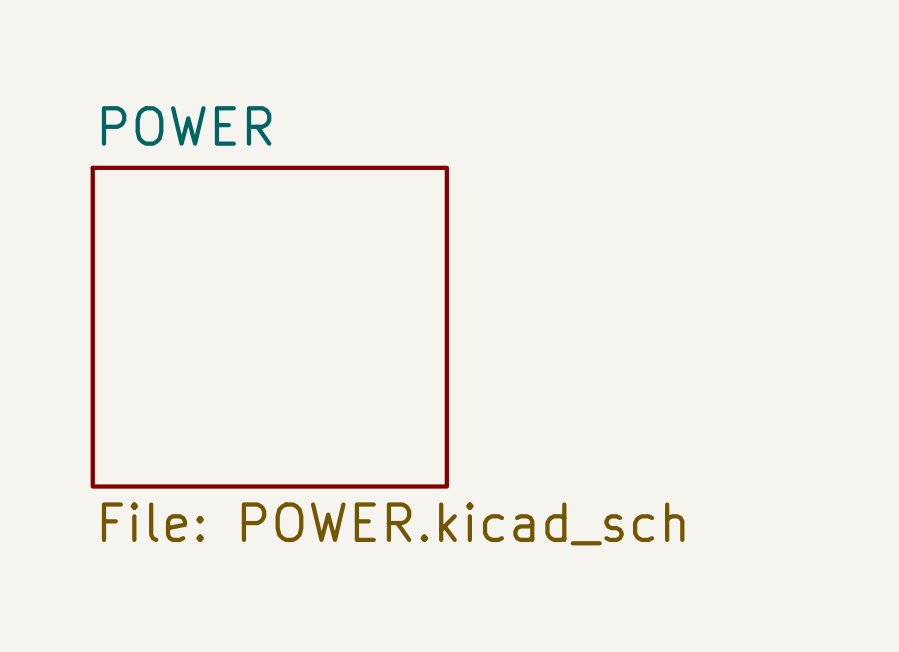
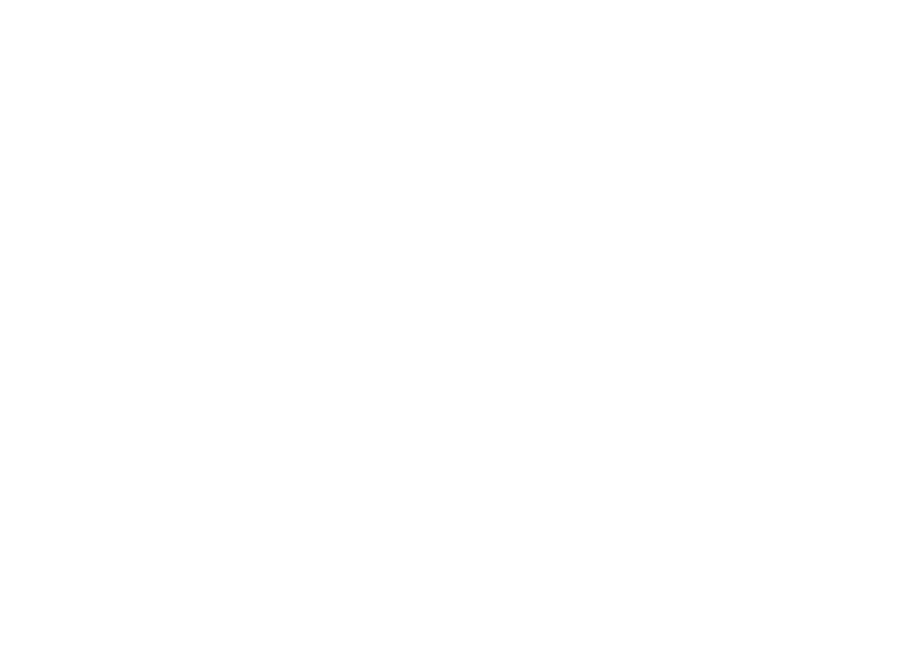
sheet POWER: File: POWER.kicad_sch (269, 327) -> none

